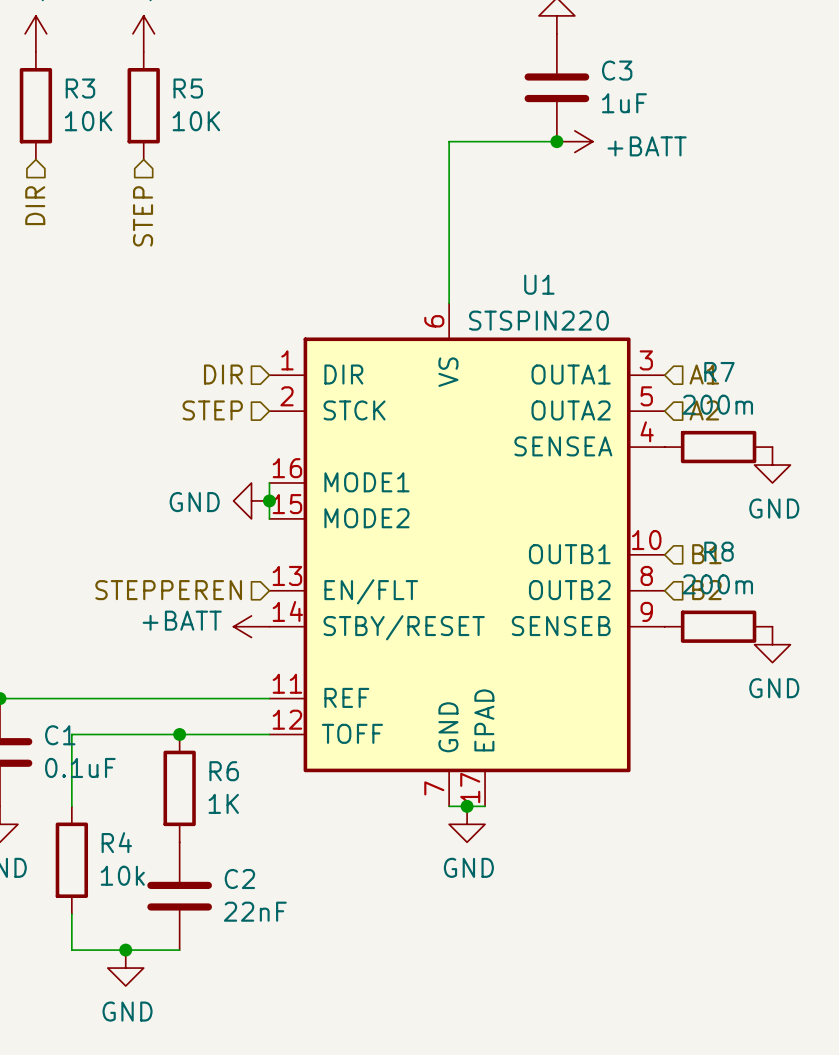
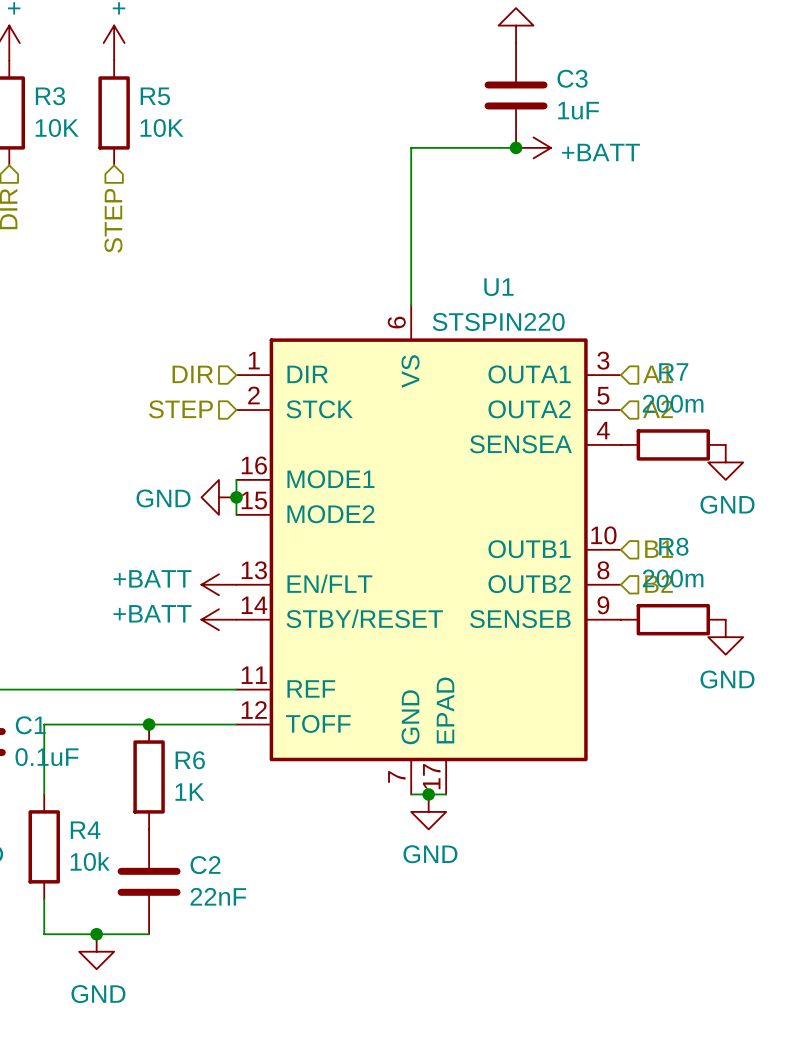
hierarchical label: STEPPEREN (168, 590) -> none
power symbol: none -> +BATT (218, 584)

